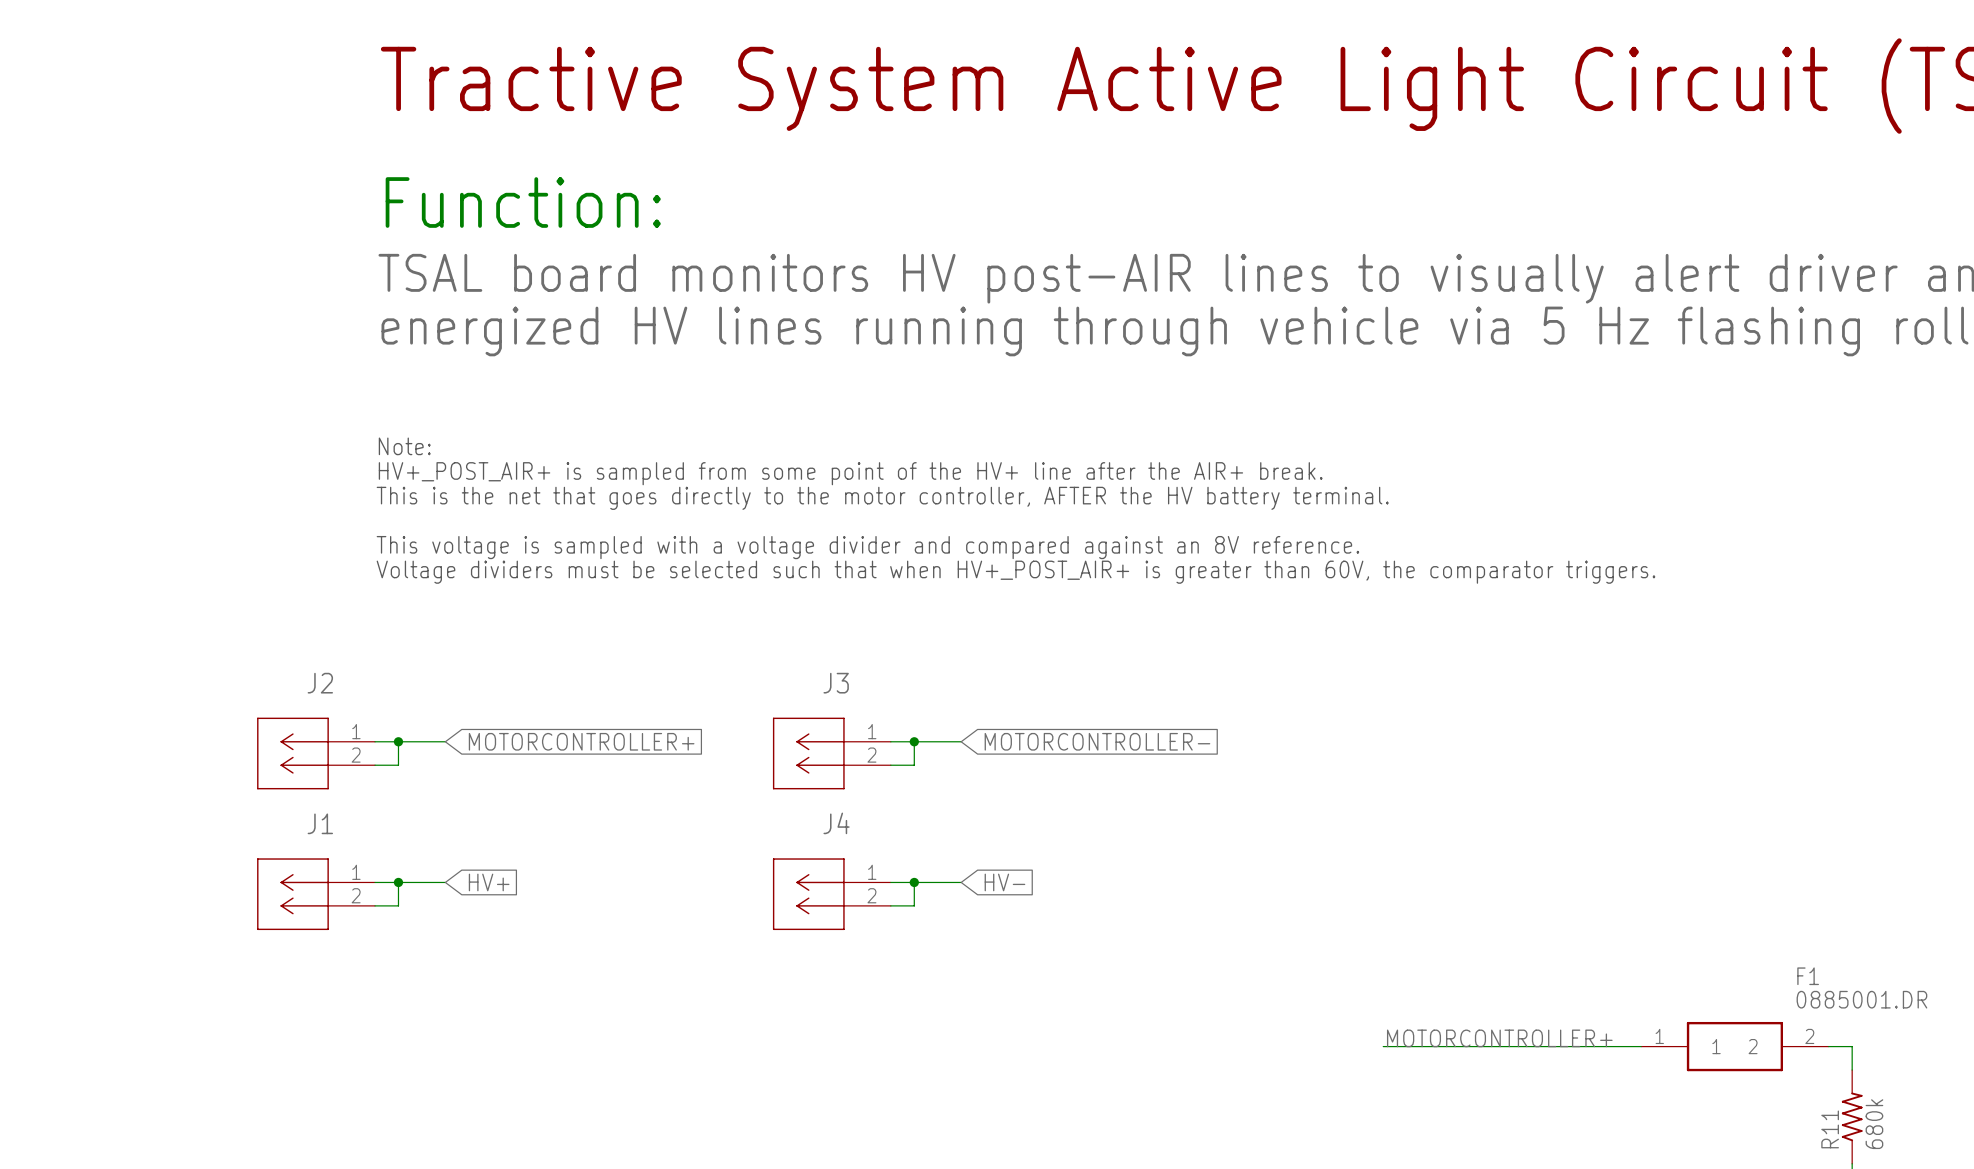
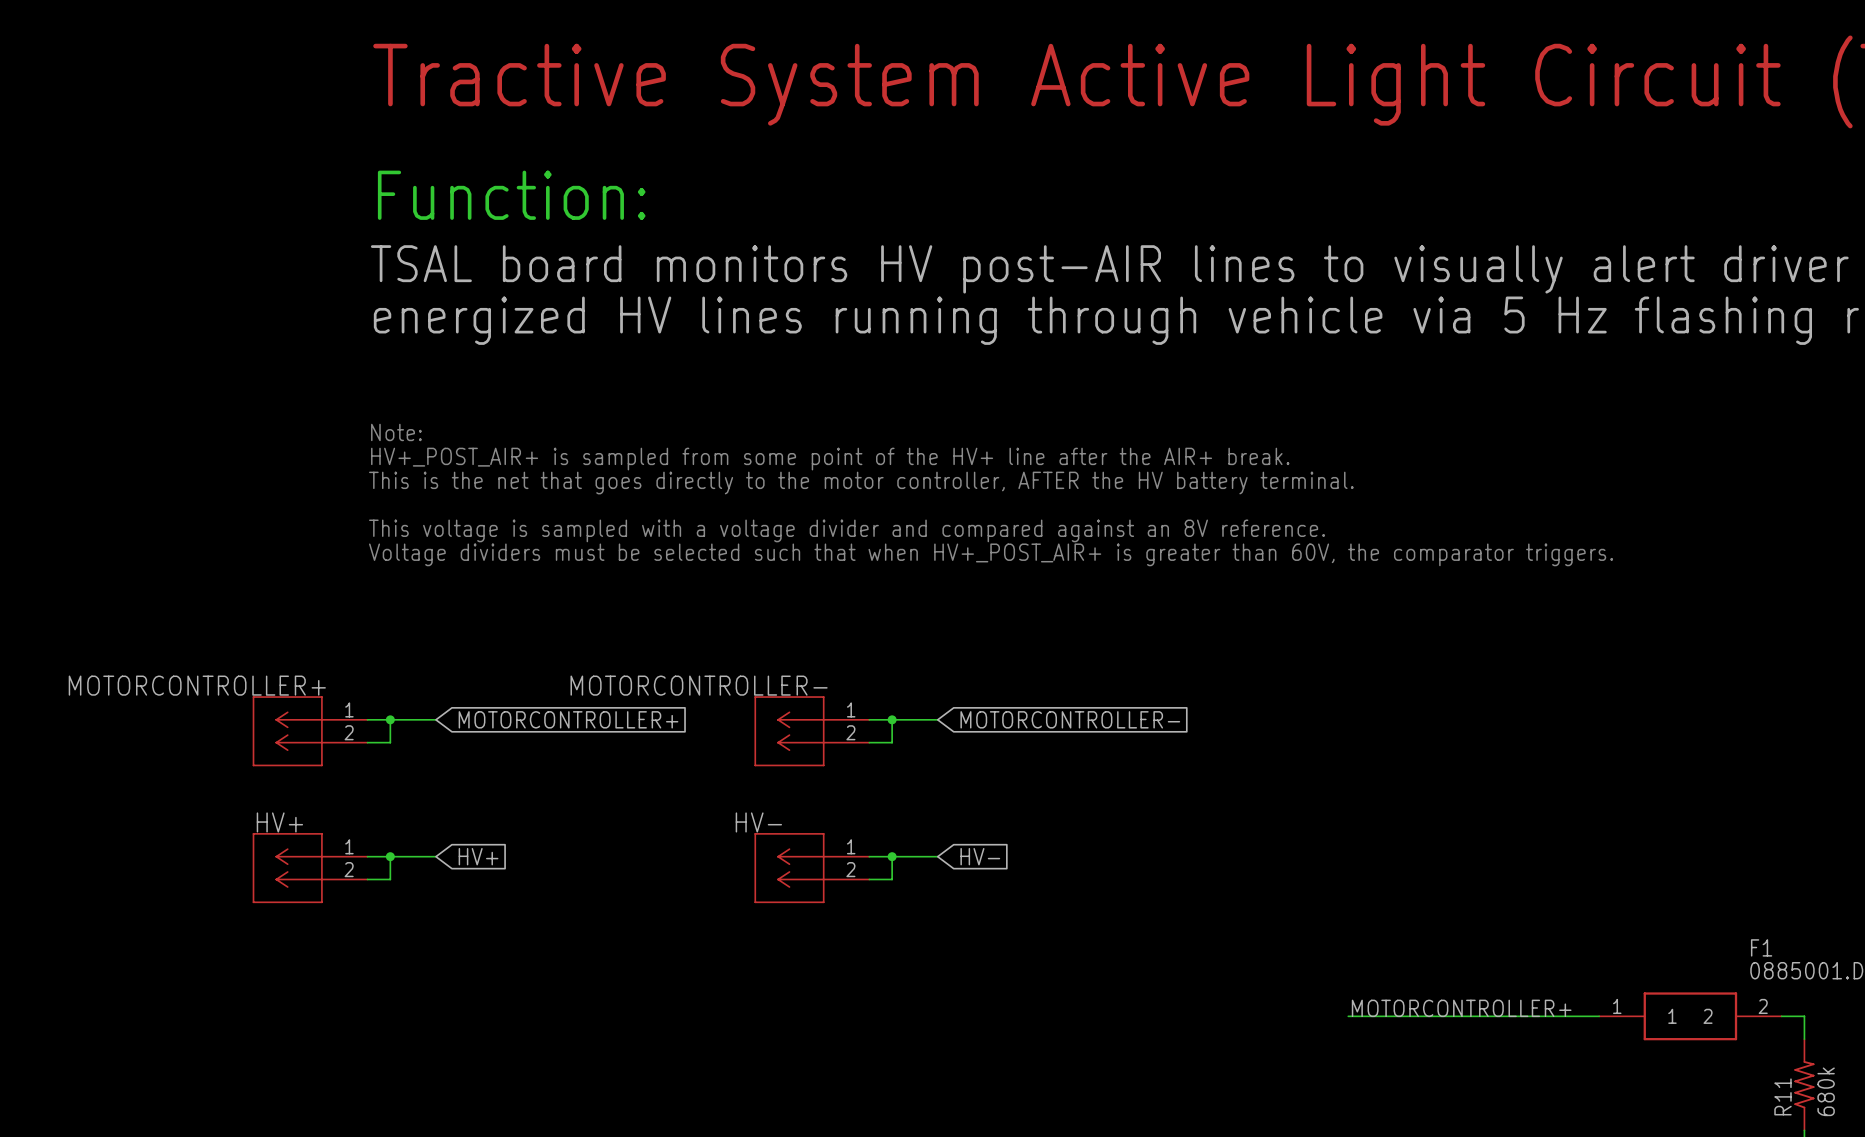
J2 name: J2 (320, 683) -> MOTORCONTROLLER+ (197, 685)
J3 name: J3 (836, 683) -> MOTORCONTROLLER- (699, 685)
J1 name: J1 (320, 823) -> HV+ (279, 822)
J4 name: J4 (836, 823) -> HV- (758, 822)

